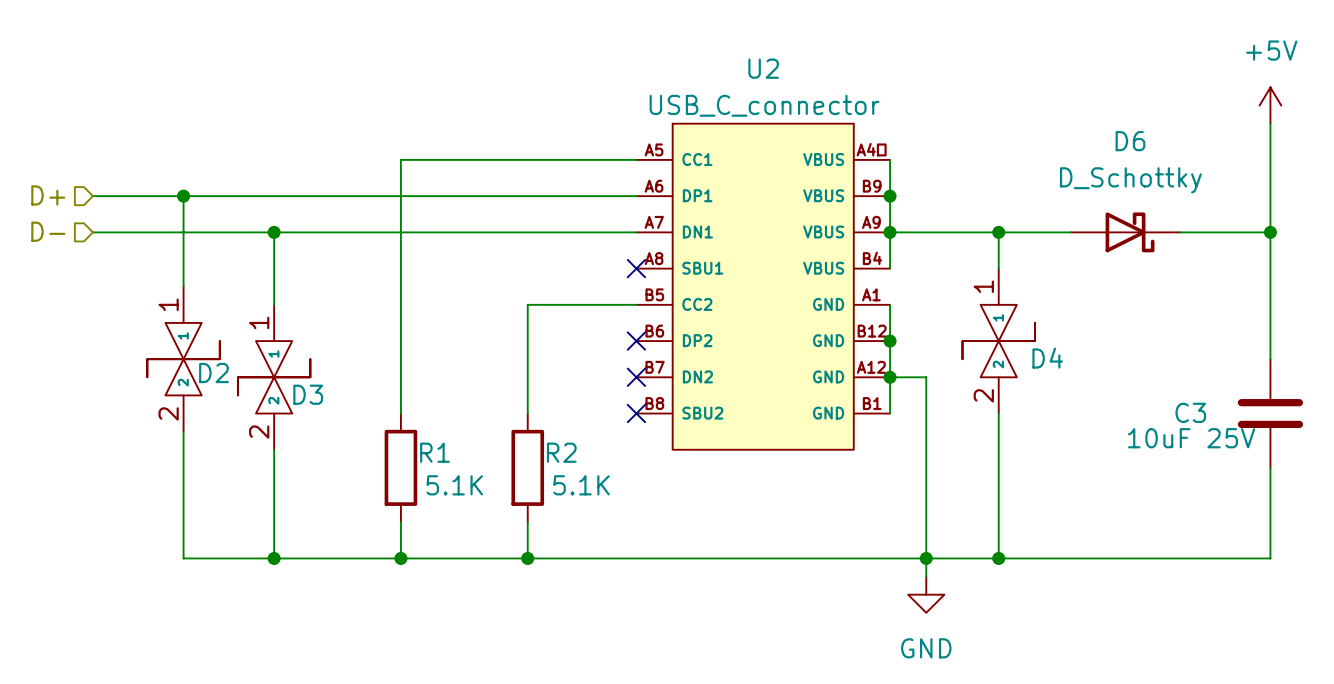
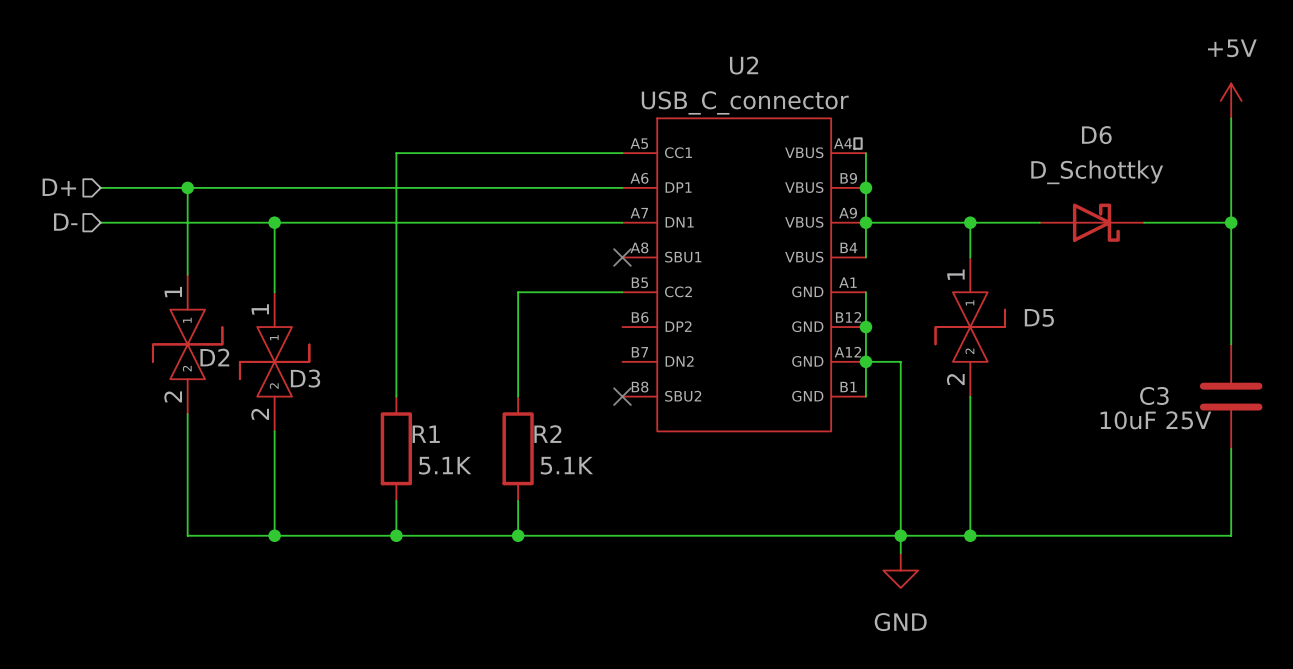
no-connect mark: (636, 341) -> none
D4 name: D4 (1047, 358) -> D5 (1039, 317)
no-connect mark: (636, 377) -> none

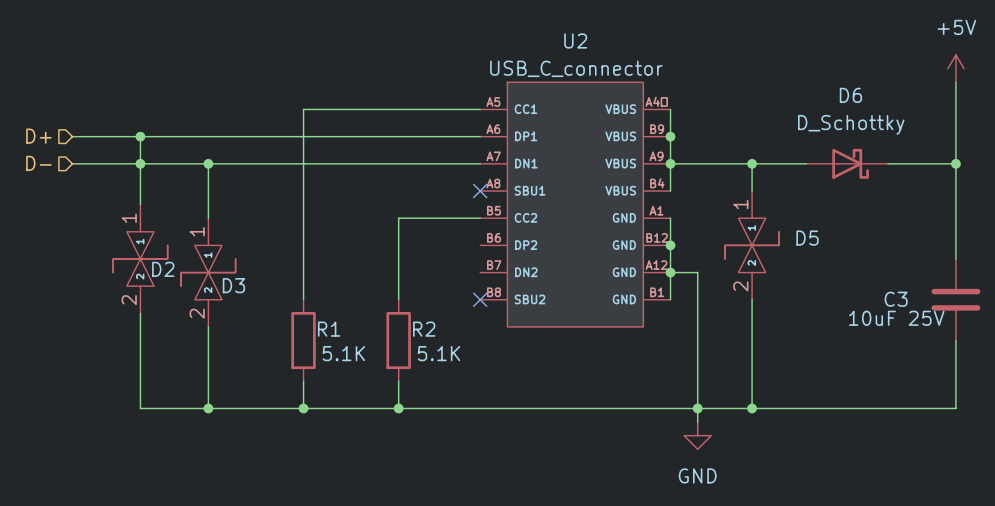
junction: none -> (140, 163)

